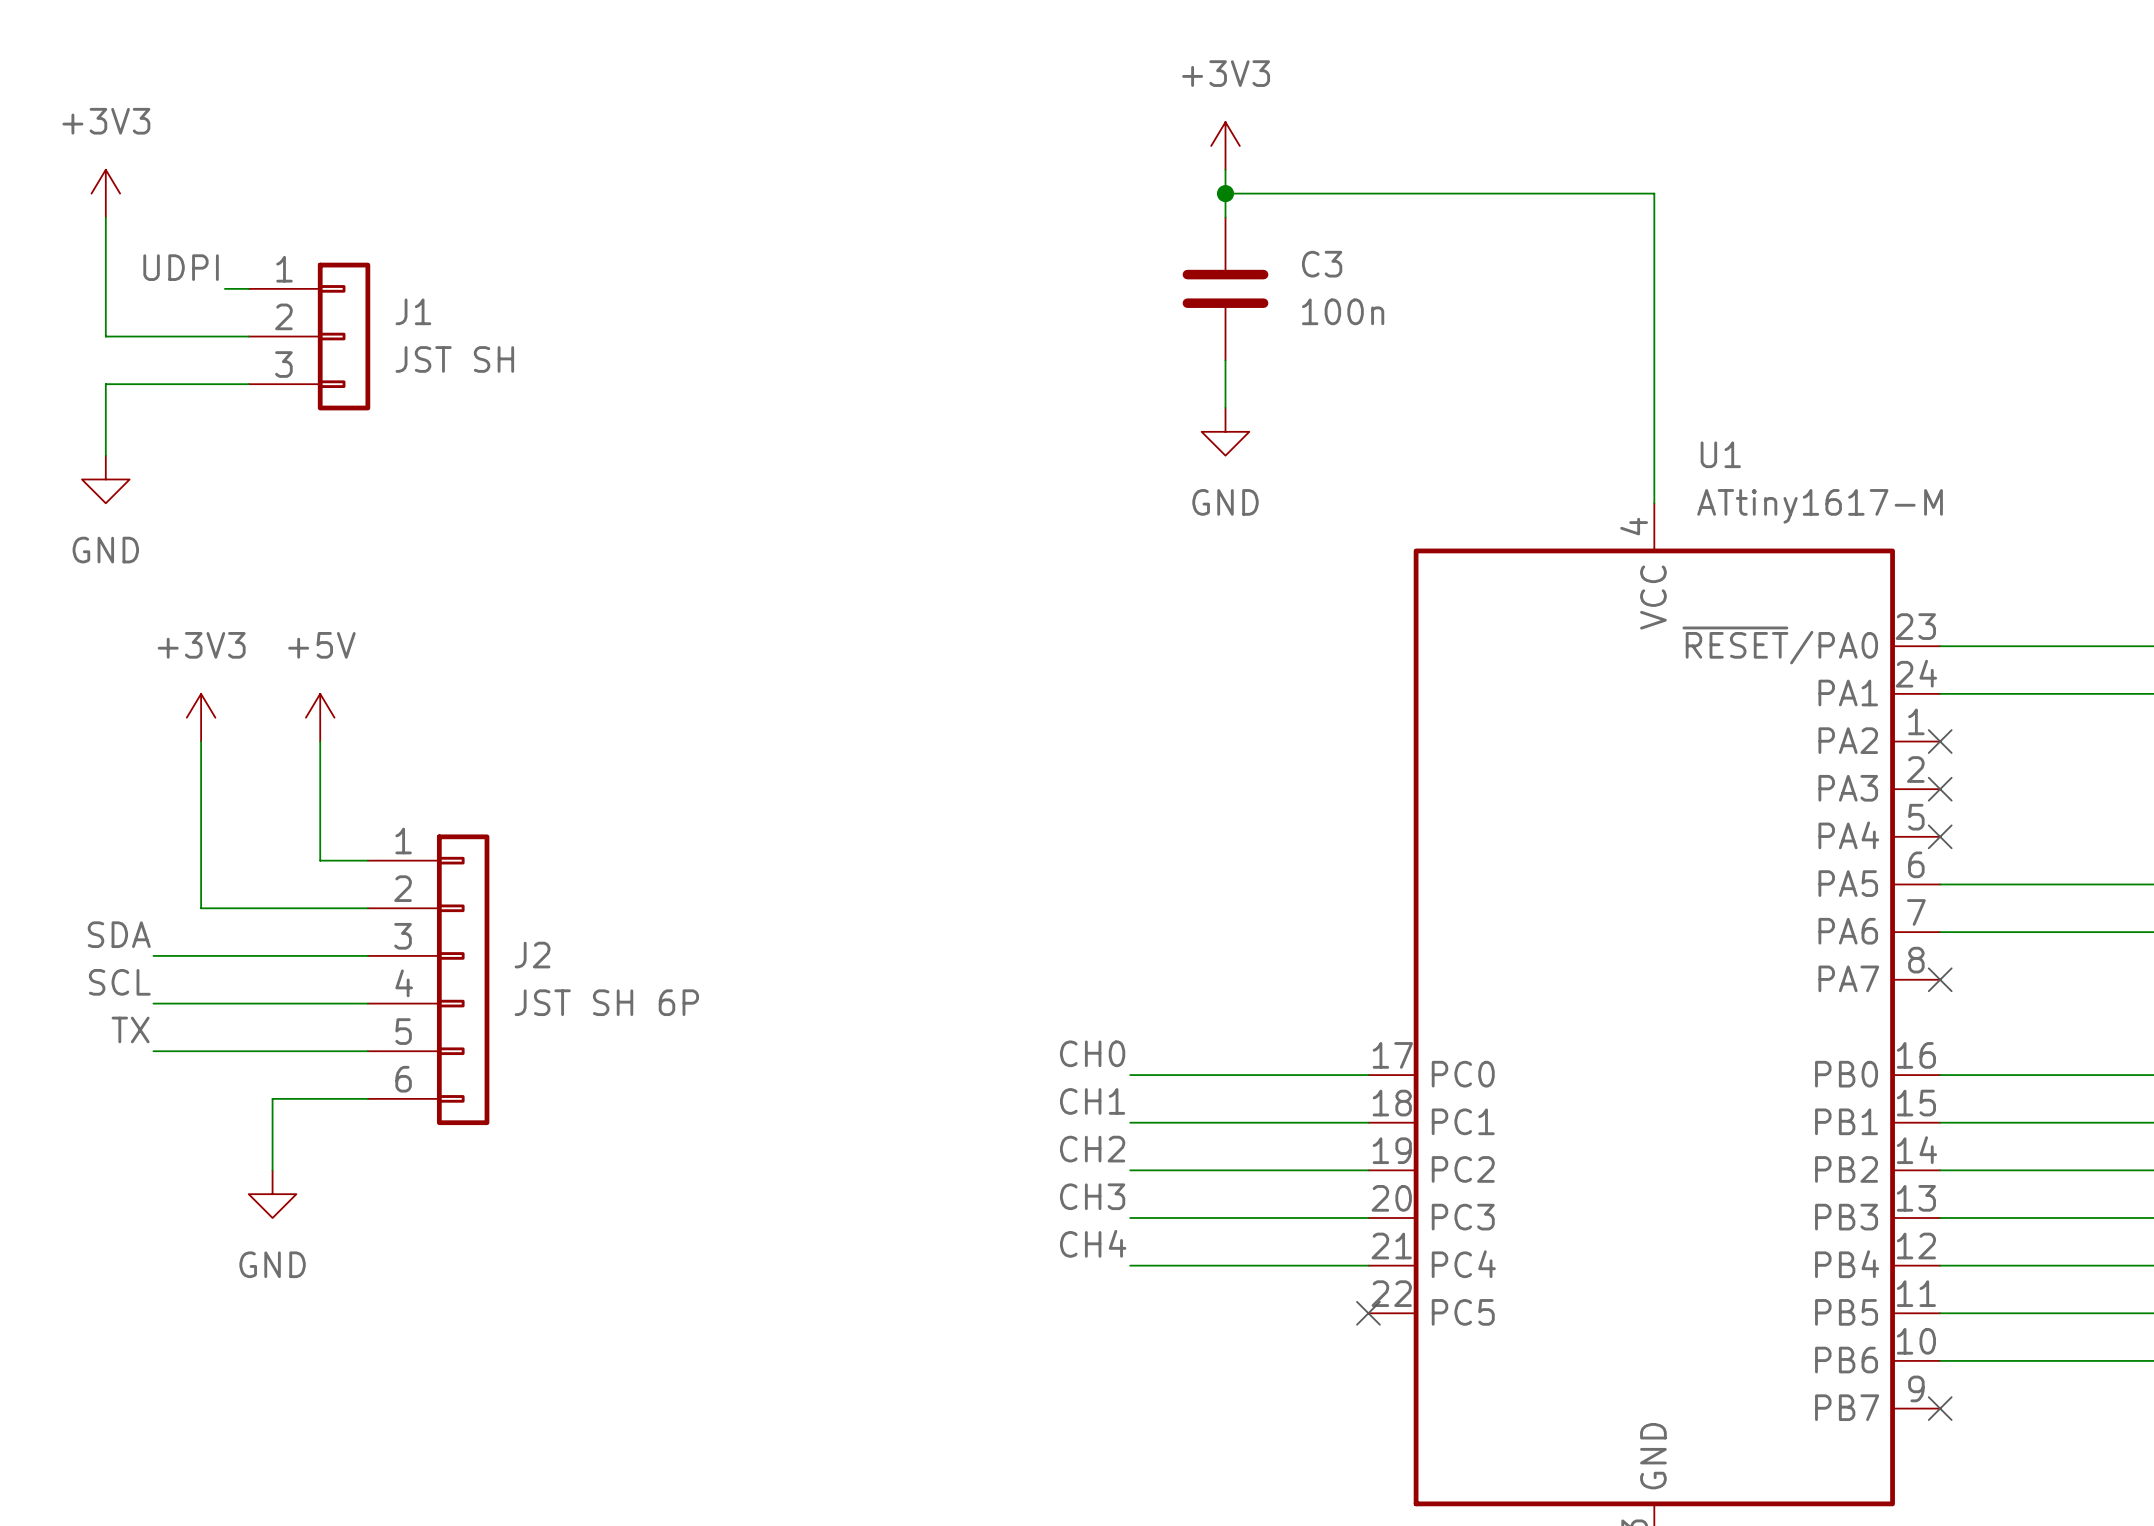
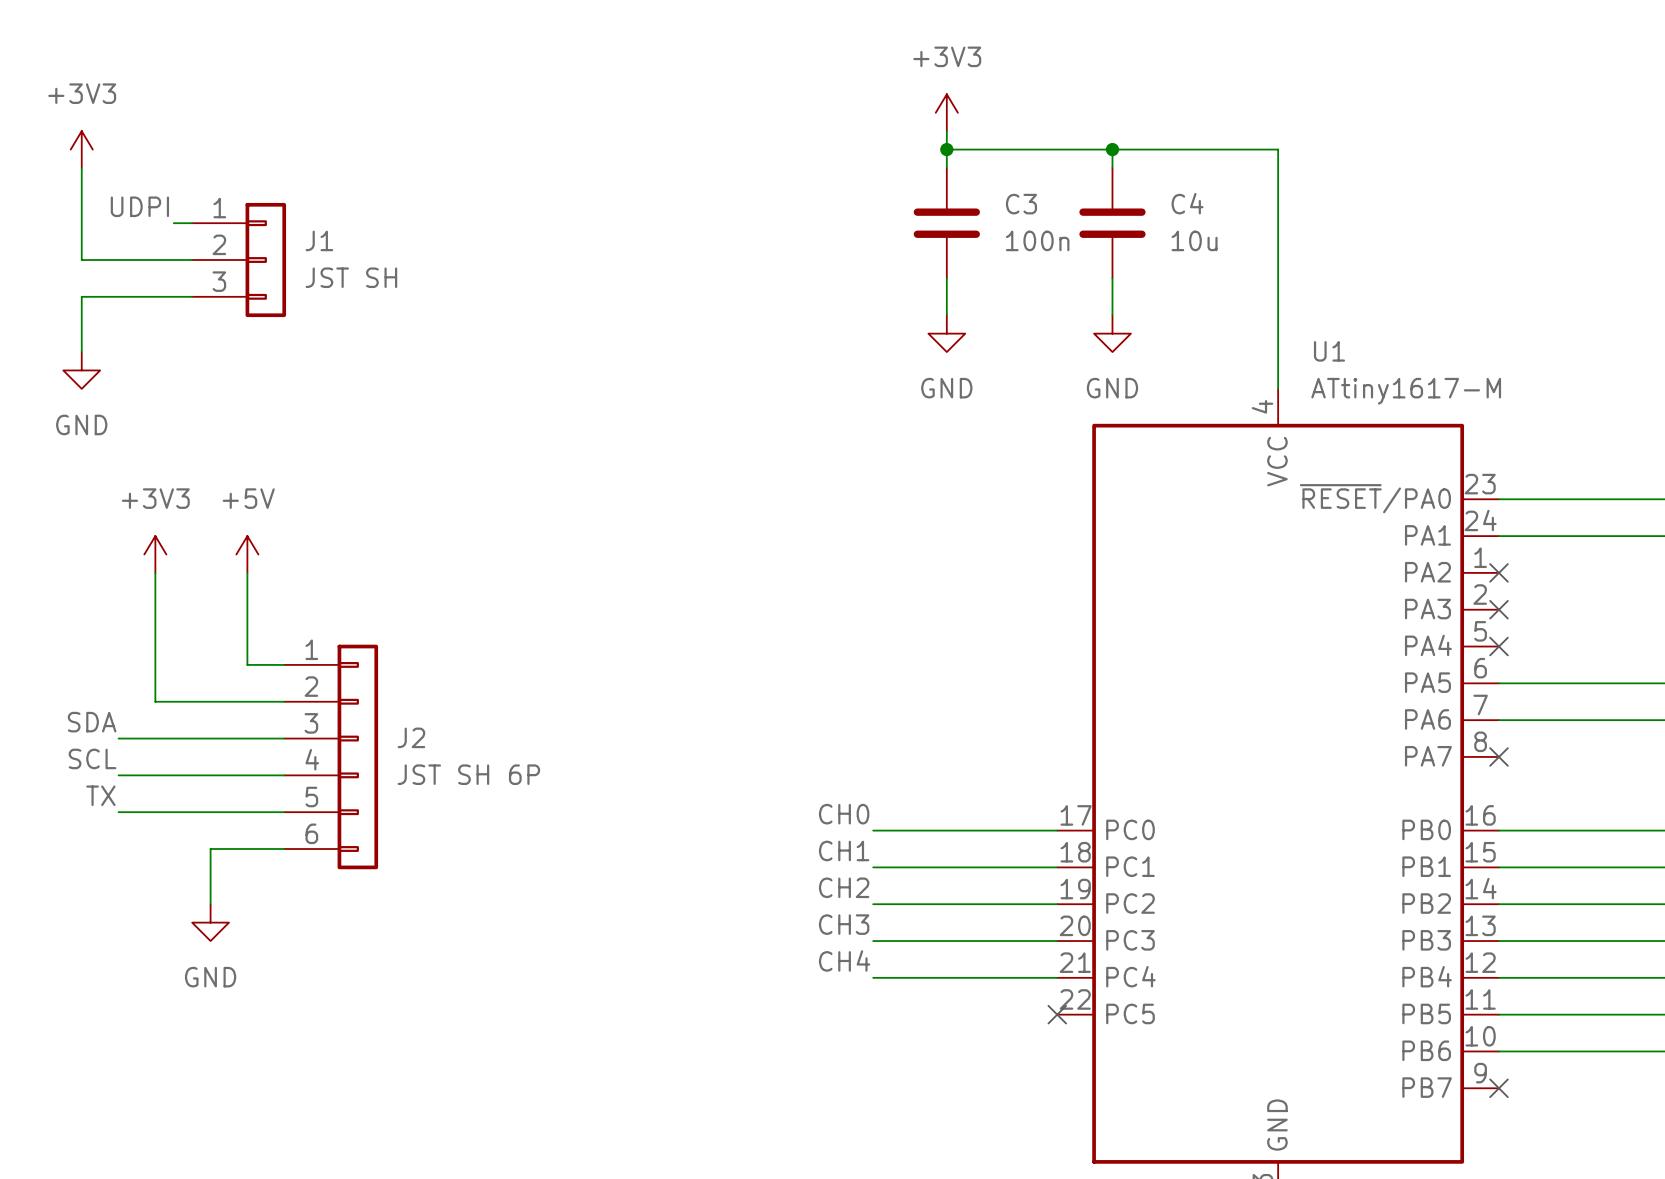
wire: none -> (1112, 149) (1112, 167)
junction: none -> (1112, 149)
C4: none -> 10u (1112, 223)
wire: none -> (1112, 278) (1112, 315)
power symbol: none -> GND (1112, 333)

